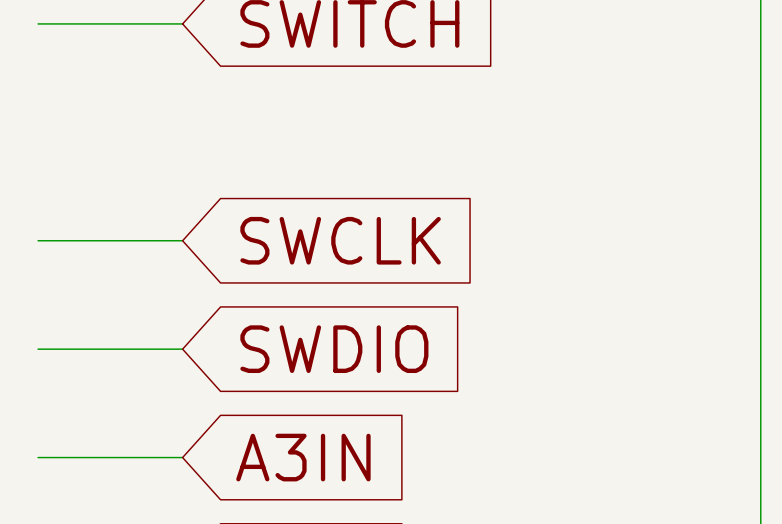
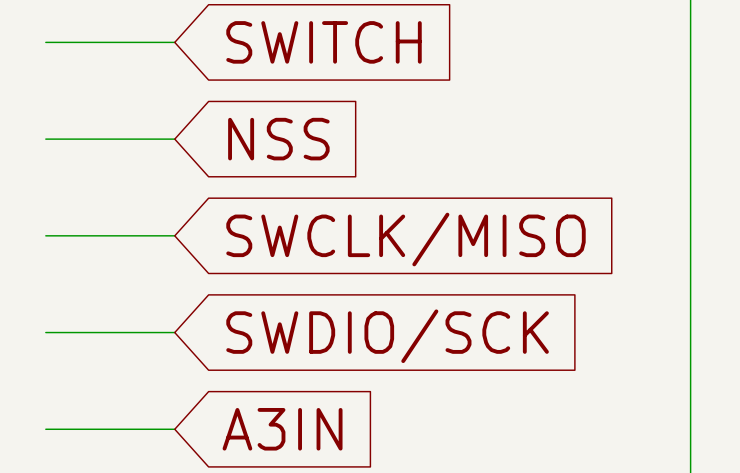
wire: none -> (45, 139) (174, 139)
global label: none -> NSS (278, 139)
global label: SWCLK (340, 240) -> SWCLK/MISO (405, 239)
global label: SWDIO (334, 349) -> SWDIO/SCK (387, 336)

